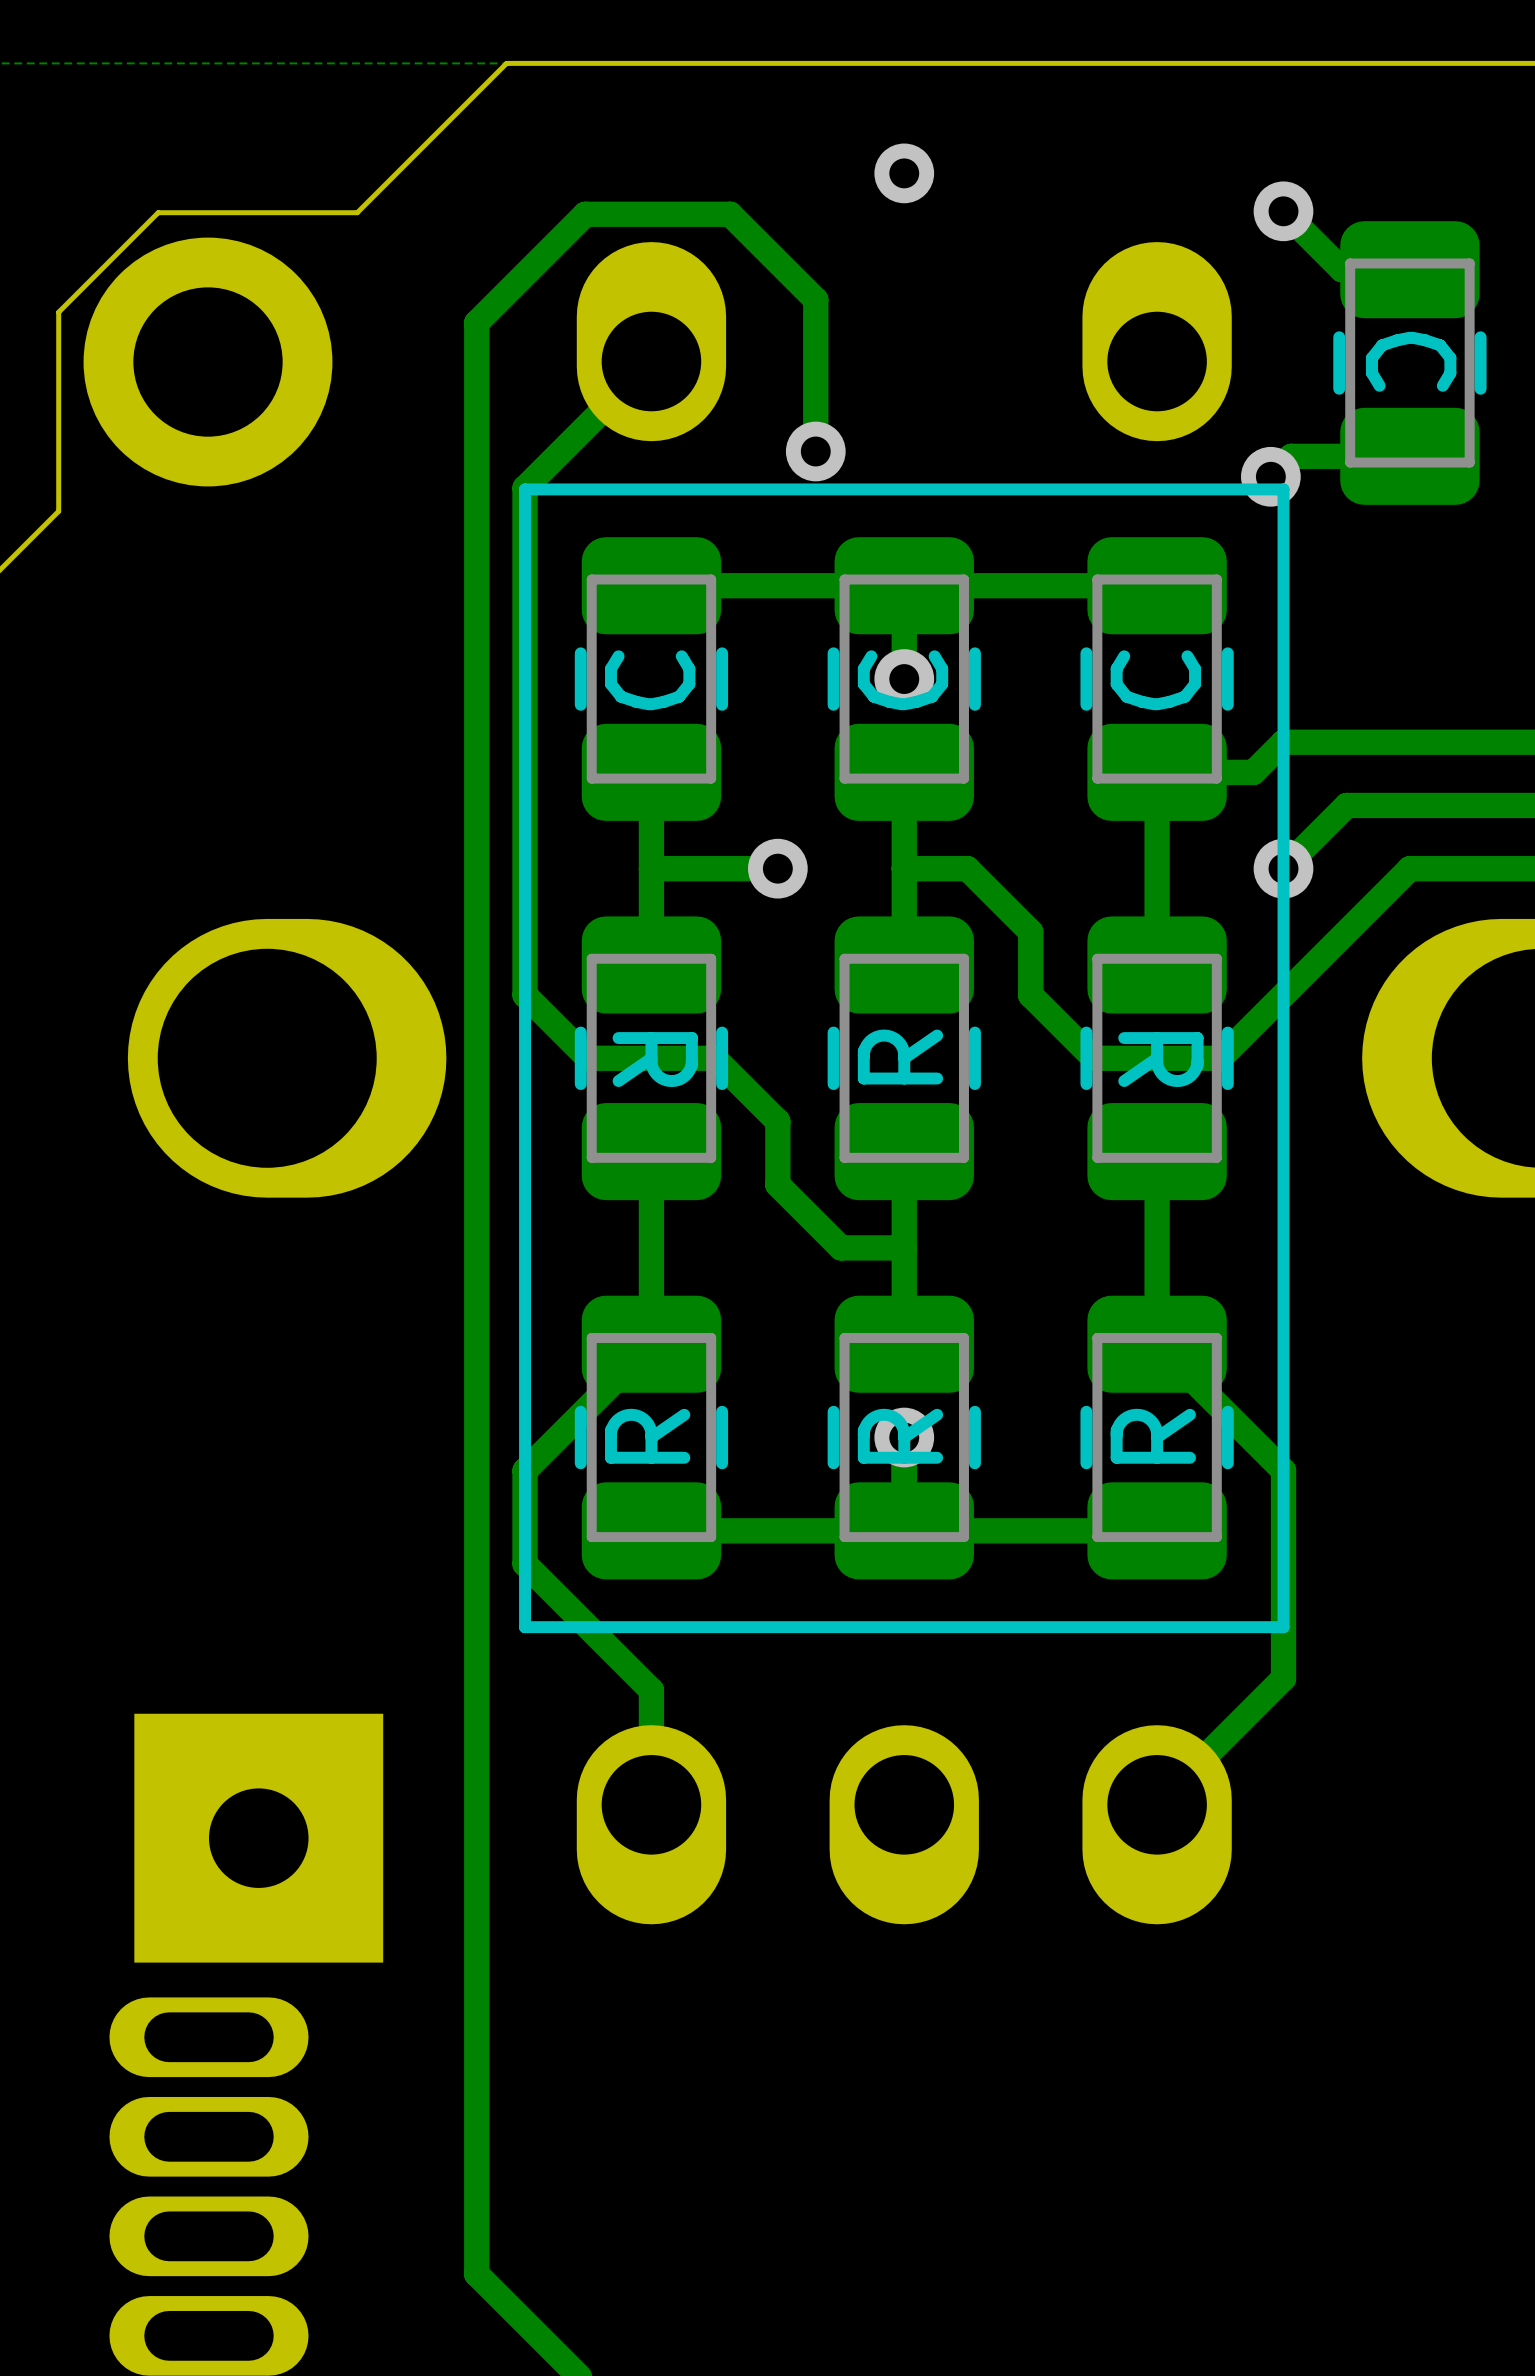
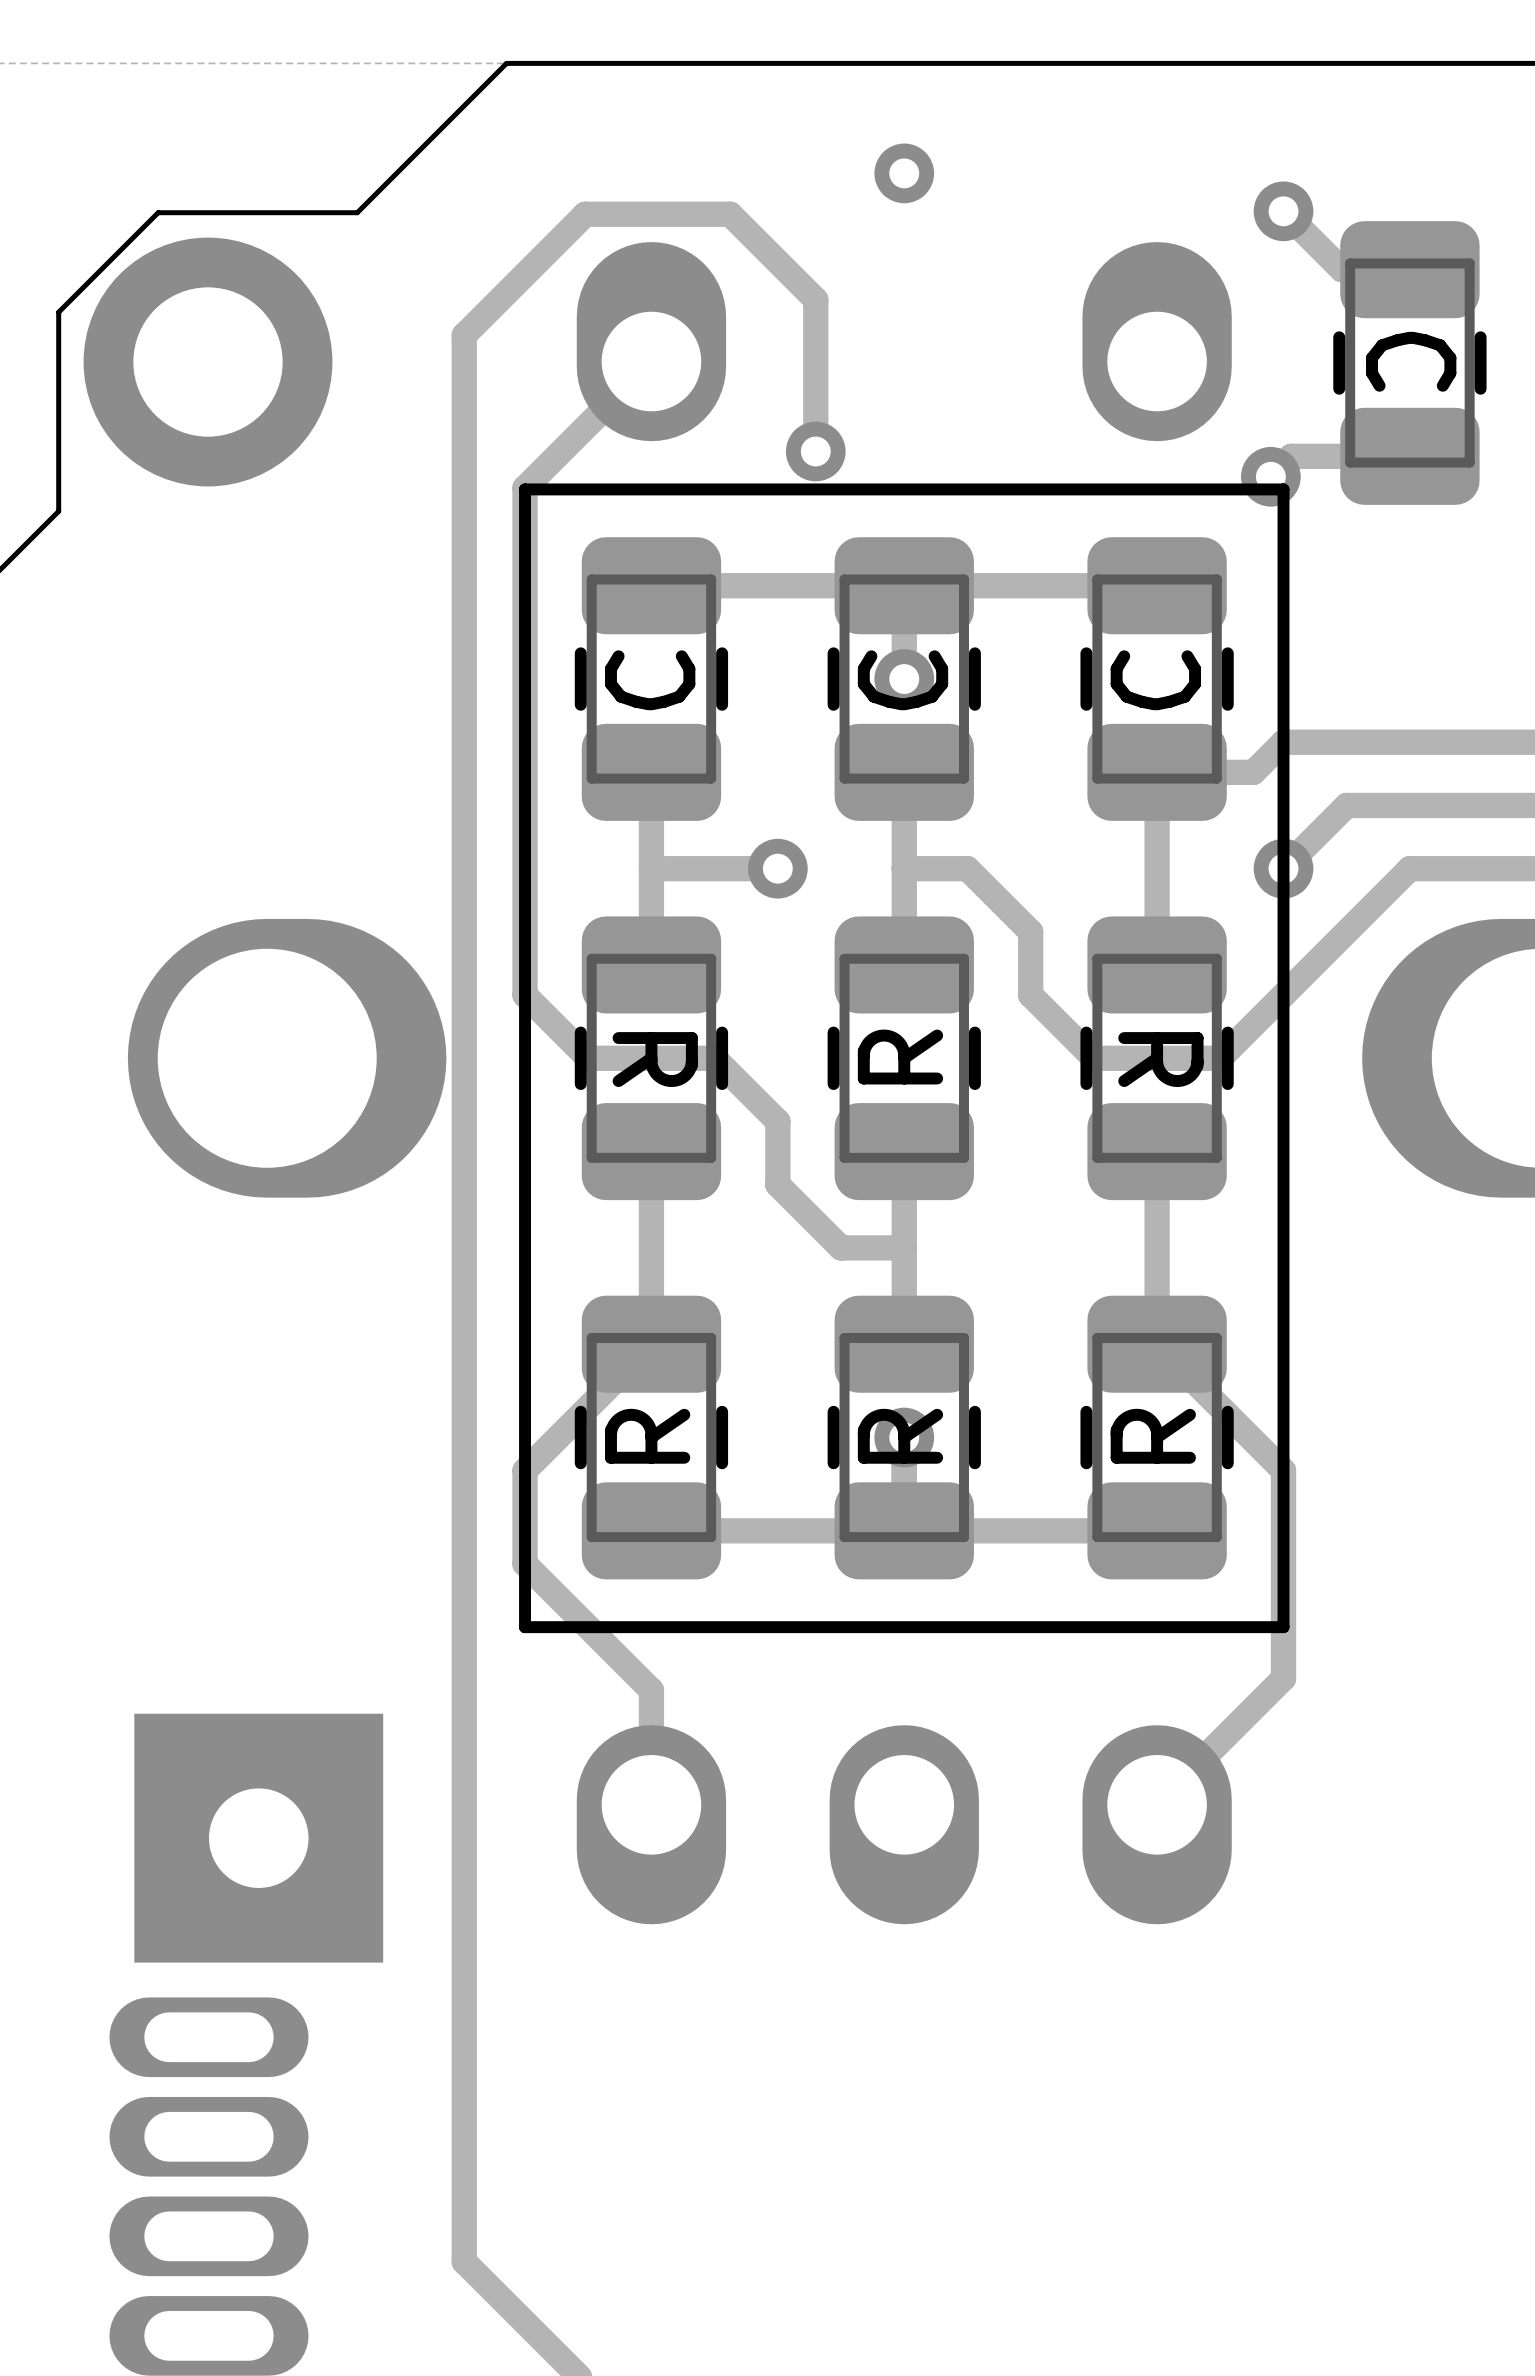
track: (476, 322) (476, 2274) -> (476, 322) (464, 335) (464, 2261) (476, 2274)

